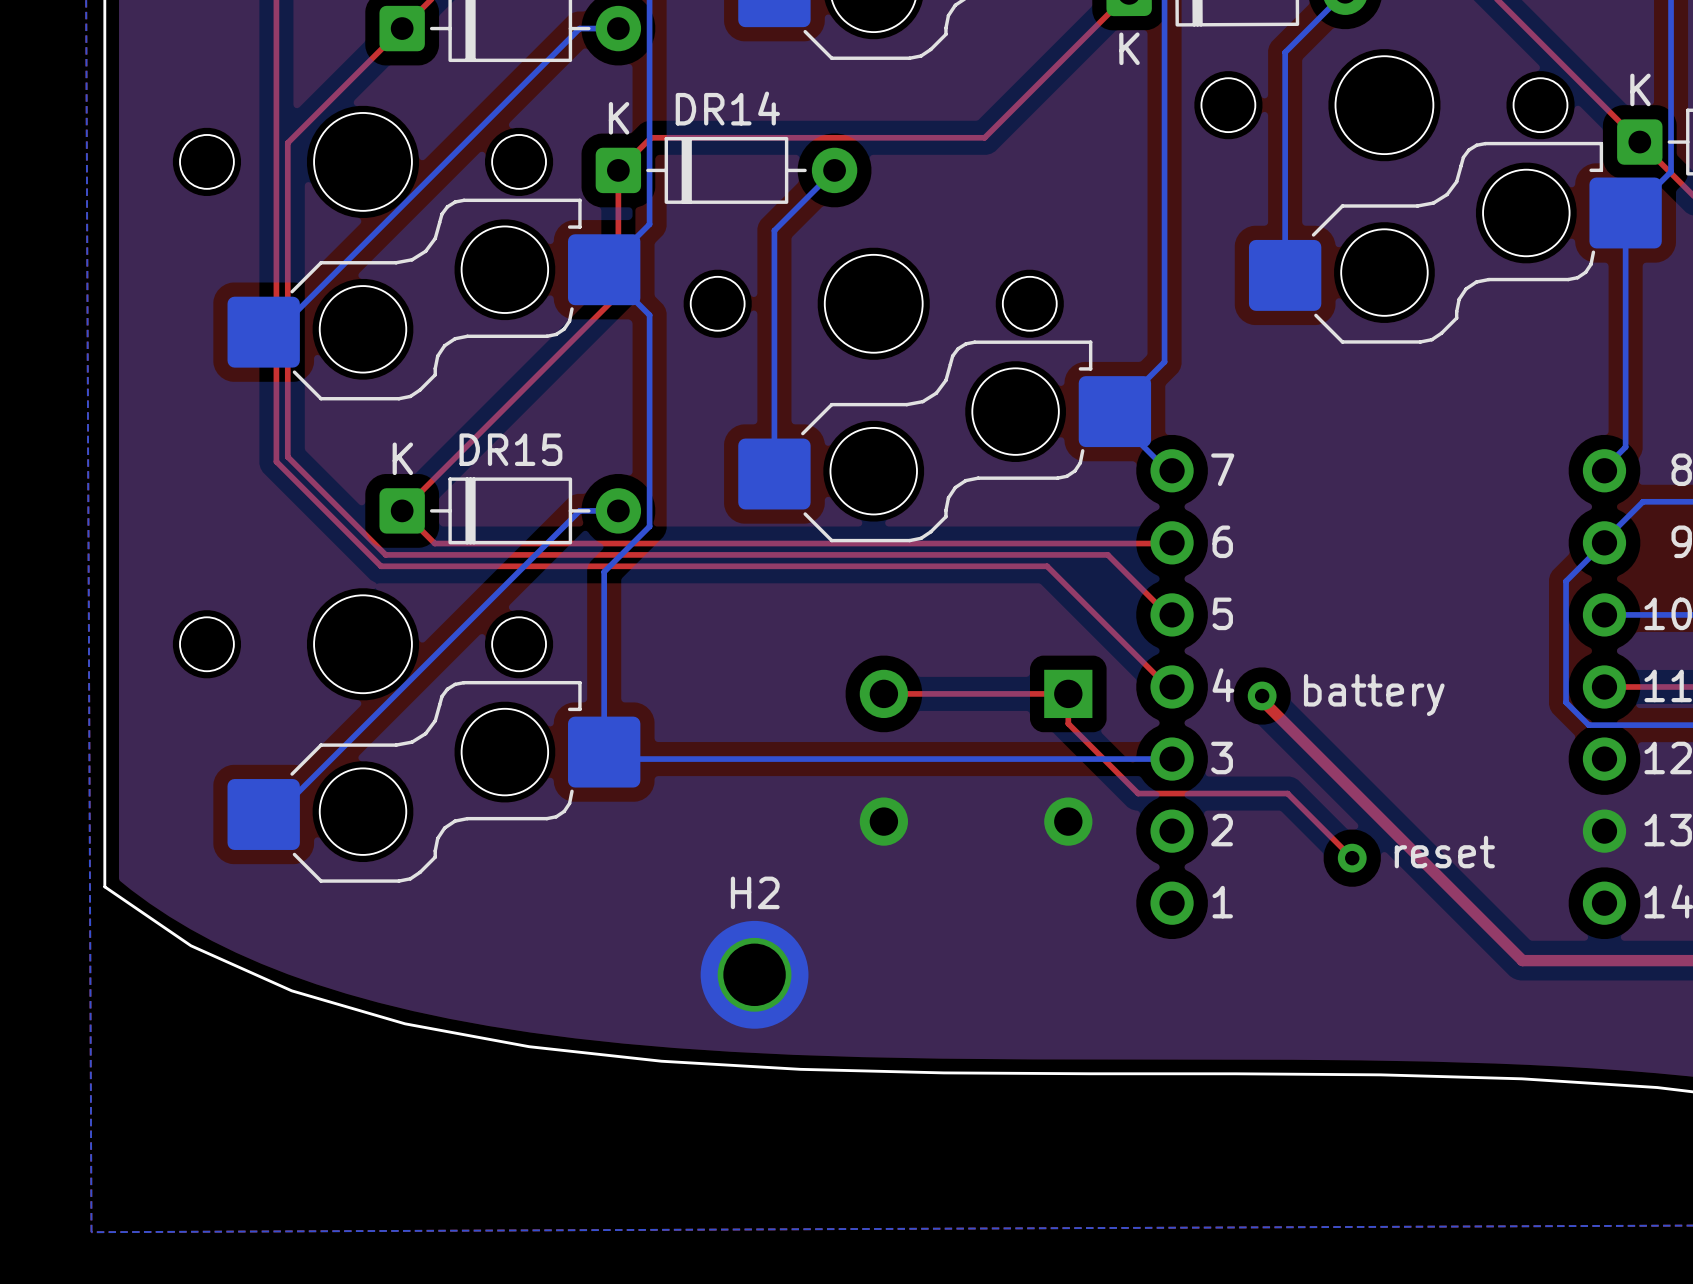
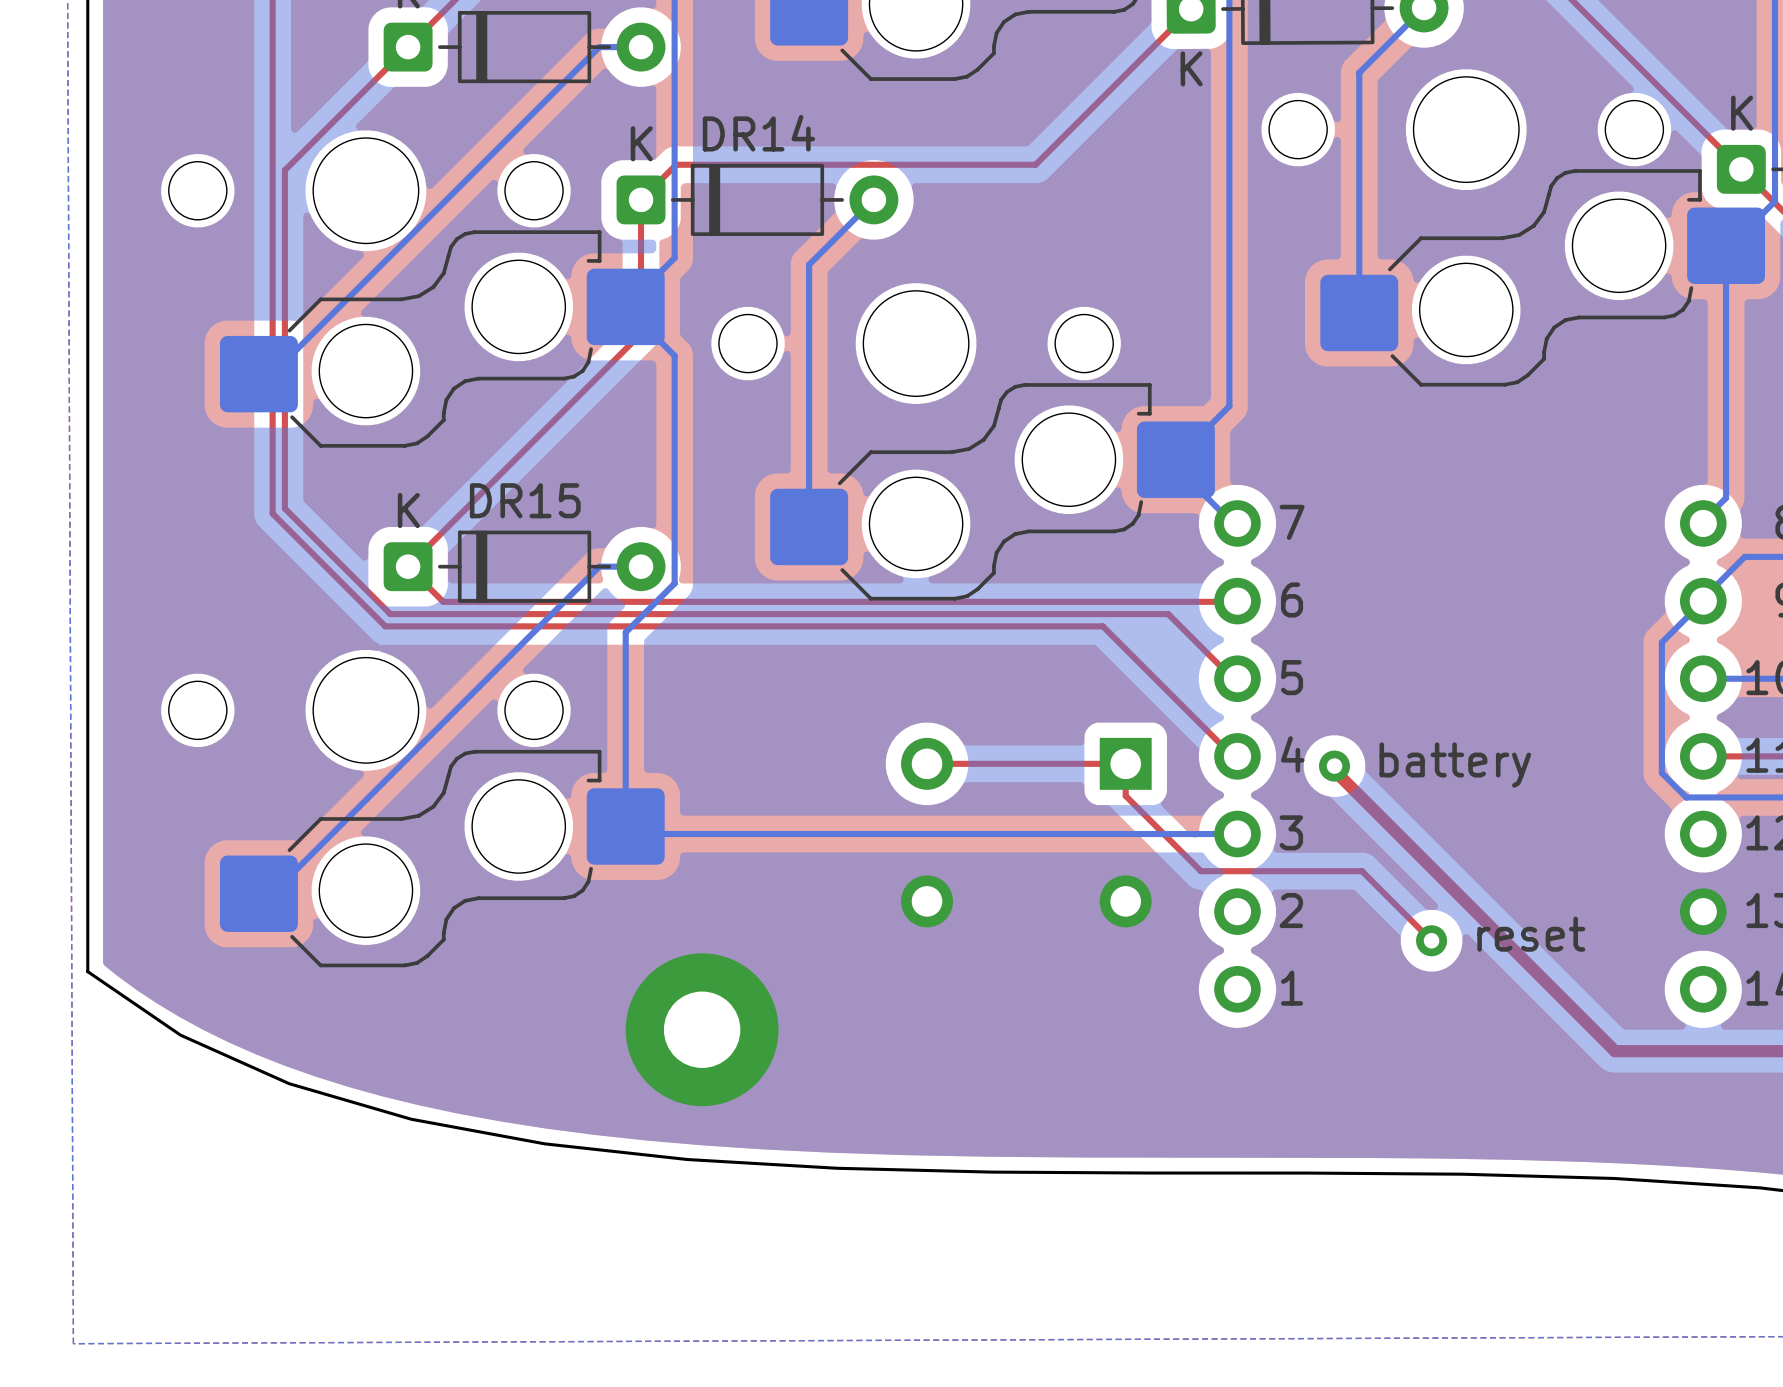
part: none -> (702, 1029)
H2: (754, 974) -> none

